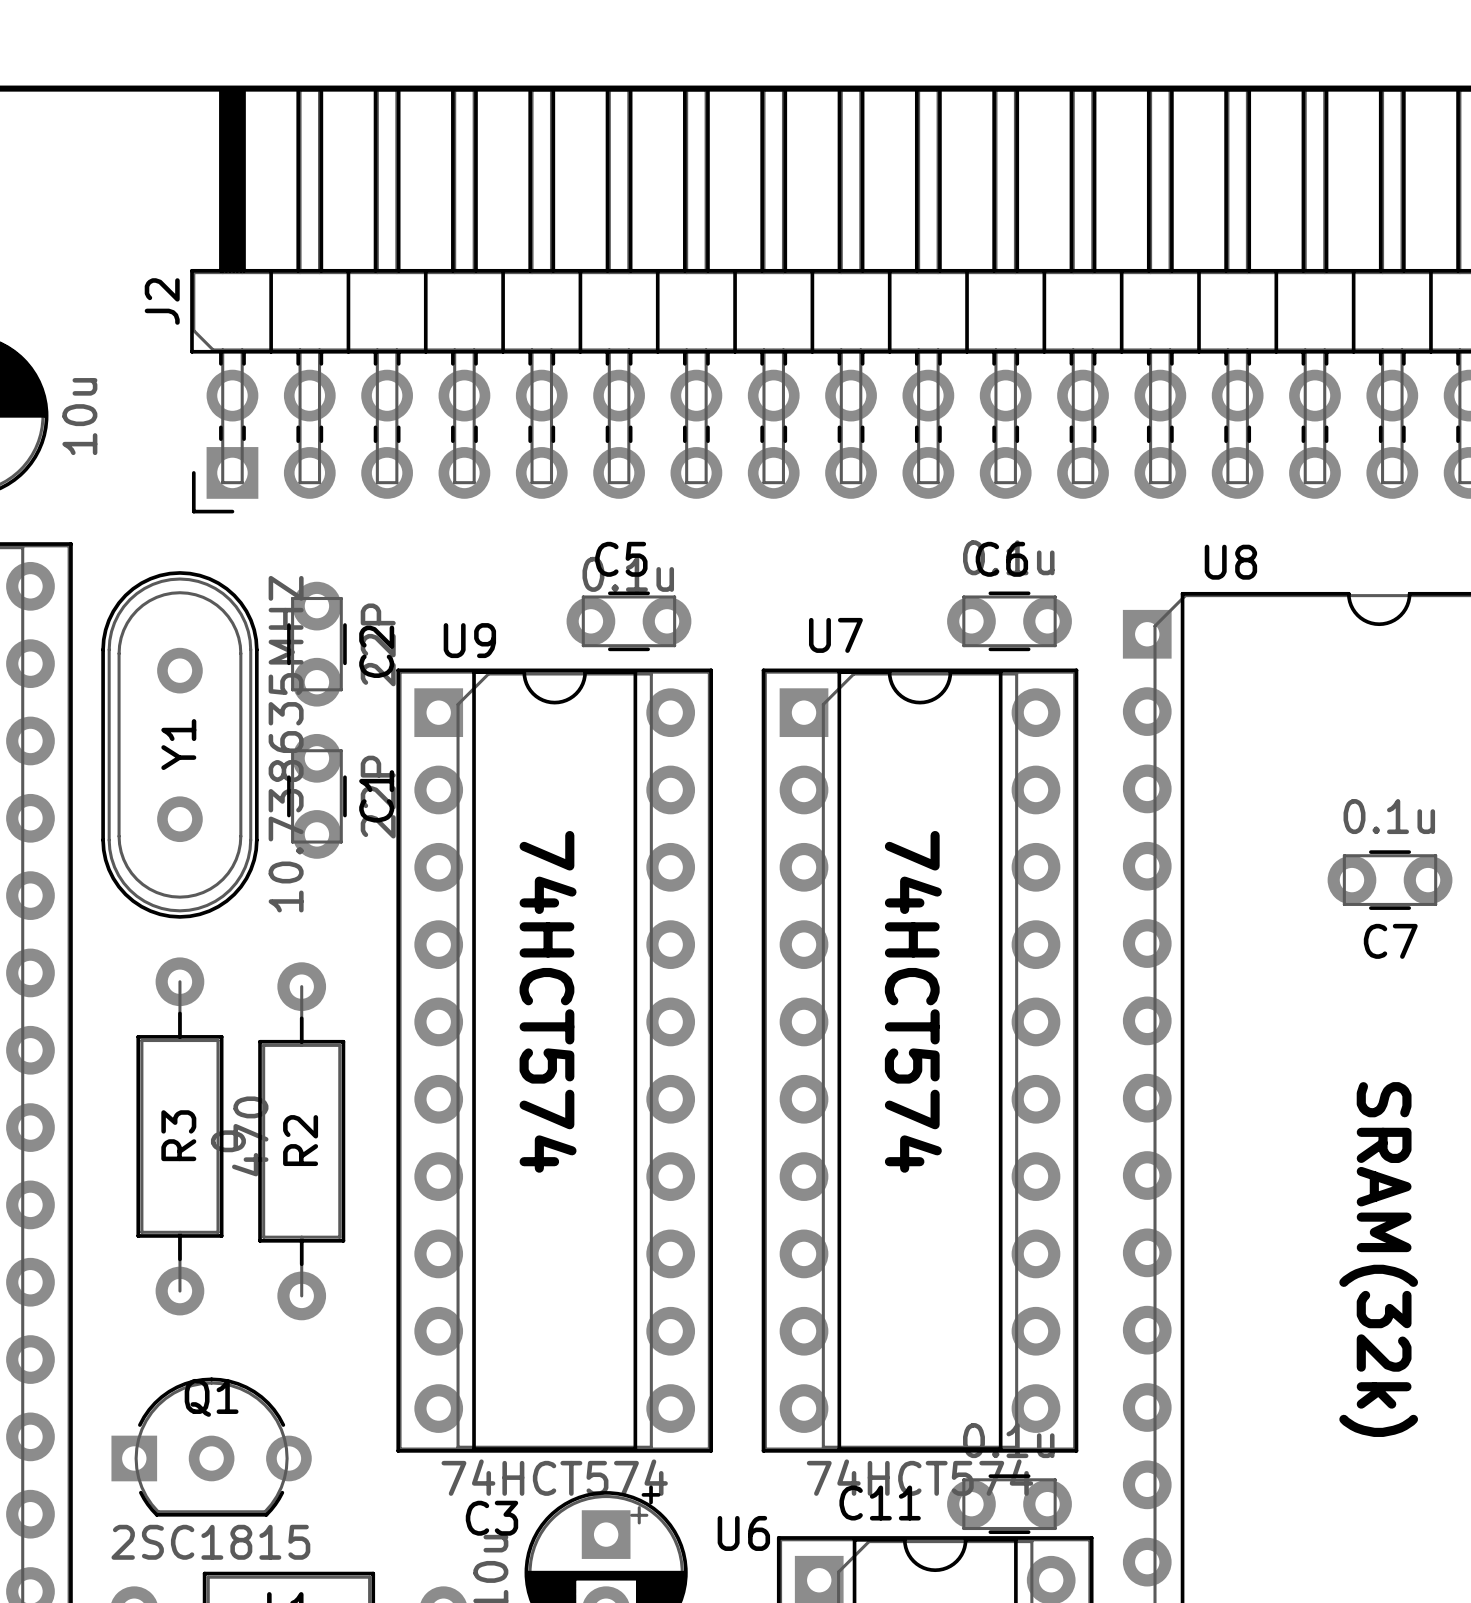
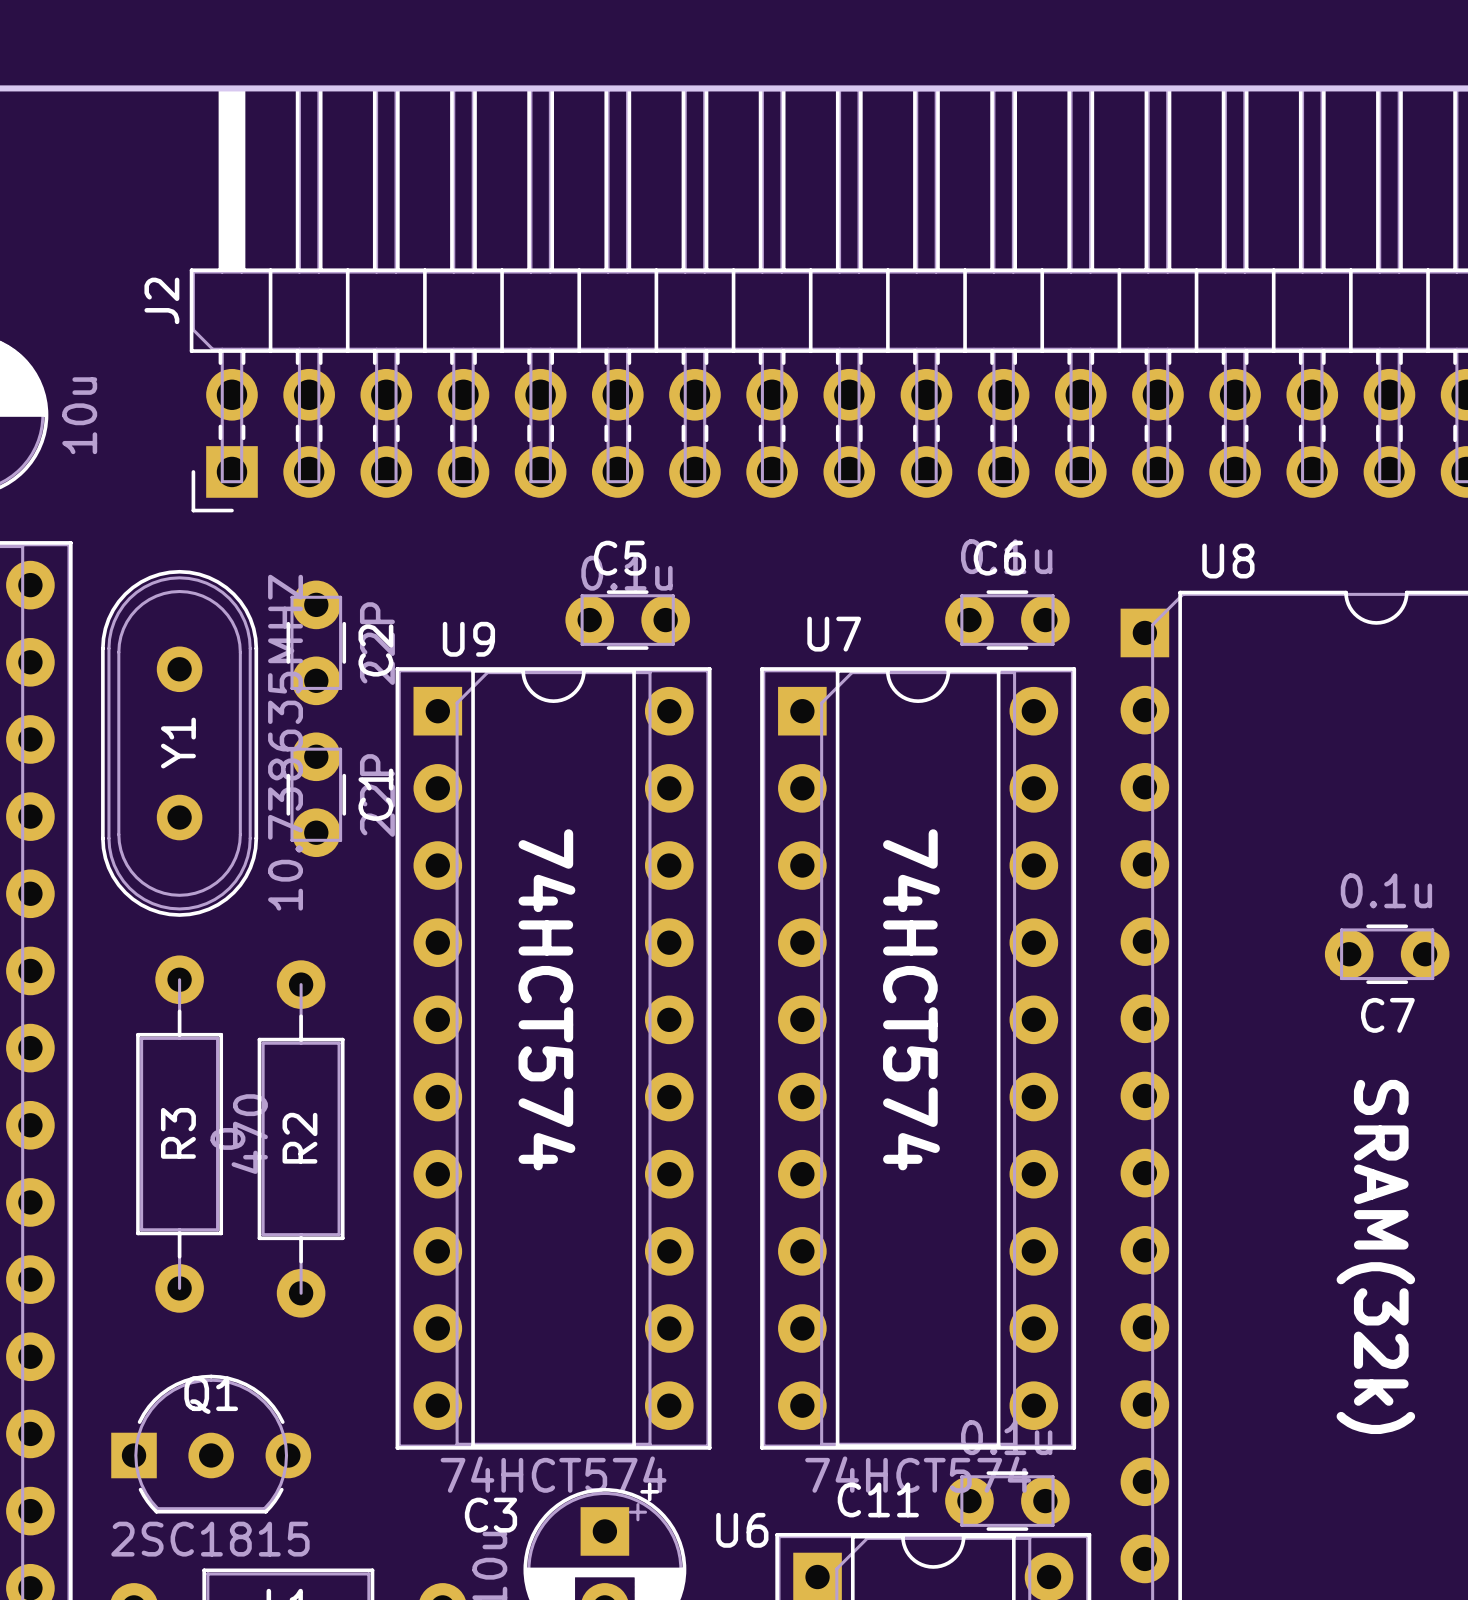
C7 position: (1390, 880) -> (1387, 954)

